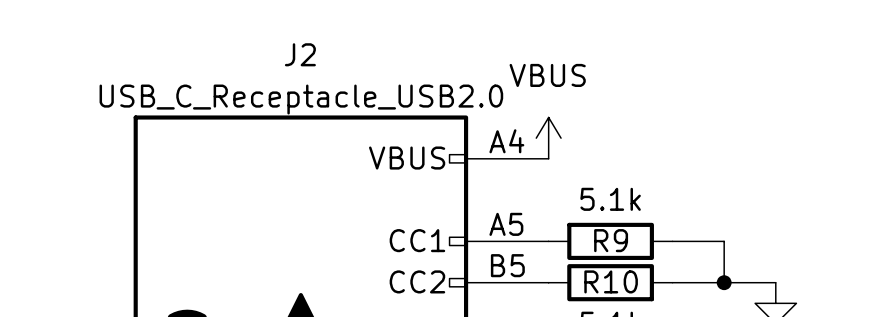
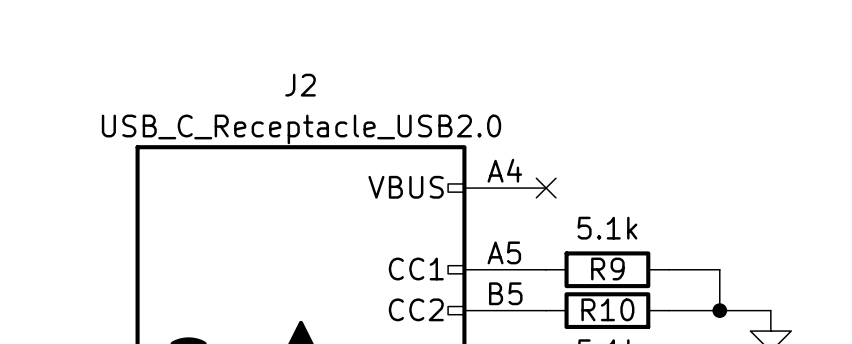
power symbol: VBUS (548, 138) -> none
no-connect mark: none -> (546, 188)

